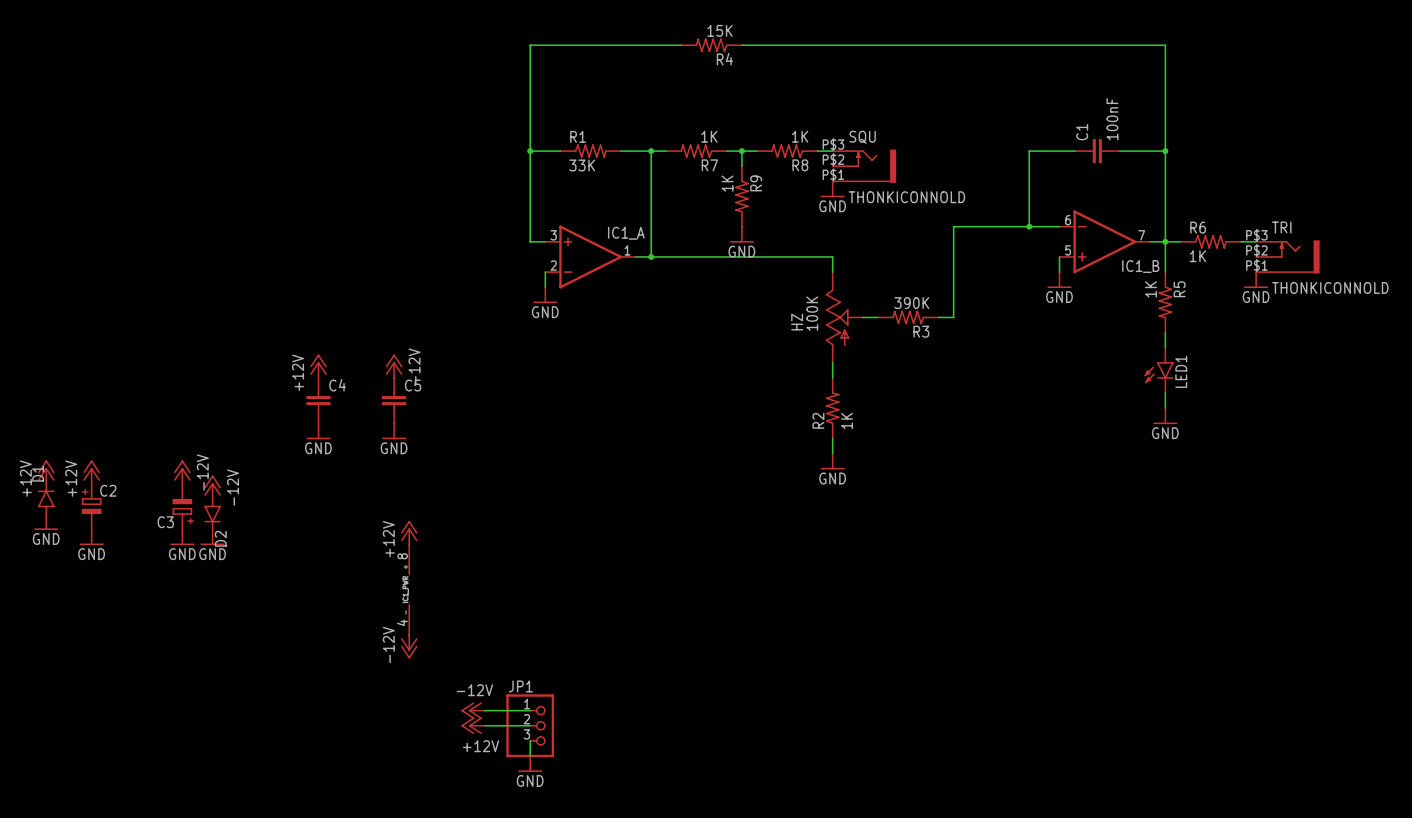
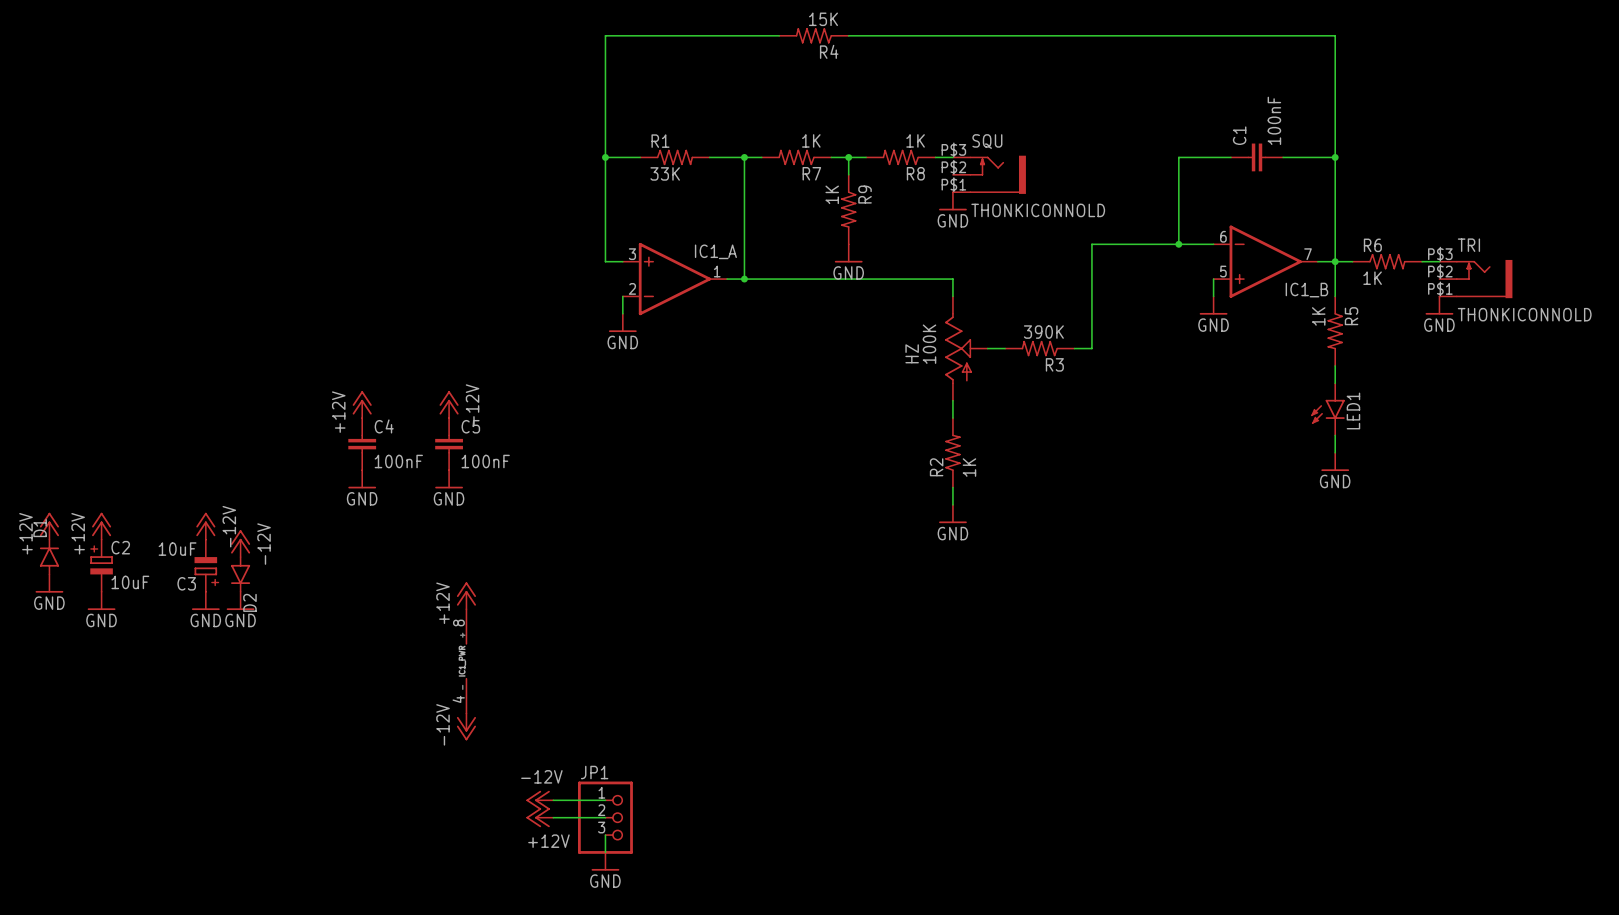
C4 value: none -> 100nF (398, 461)
C5 value: none -> 100nF (485, 461)
C3 value: none -> 10uF (177, 549)
C2 value: none -> 10uF (130, 582)

